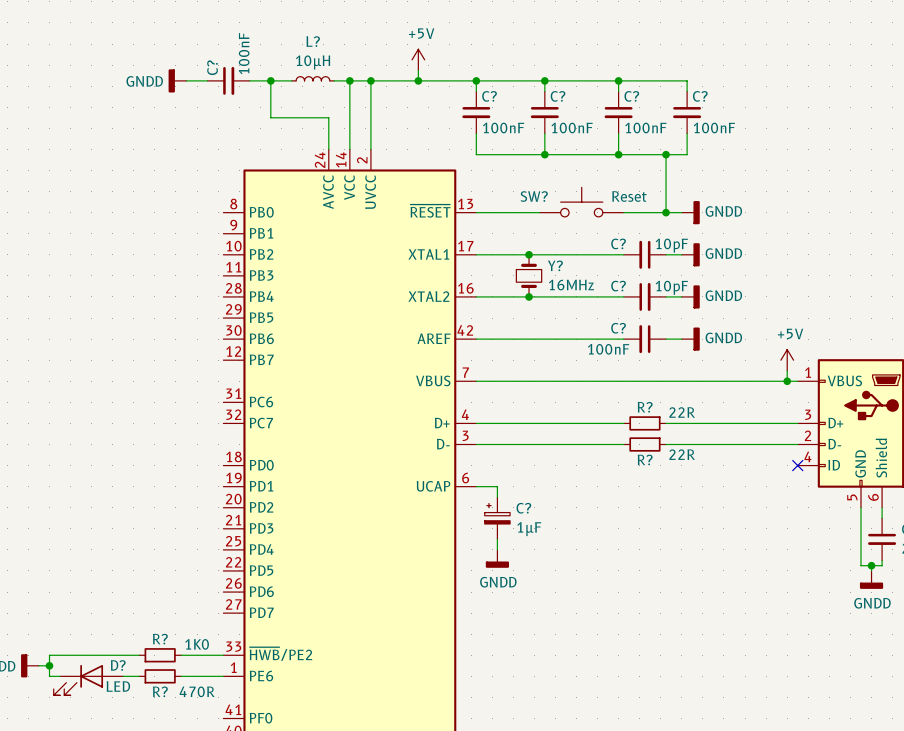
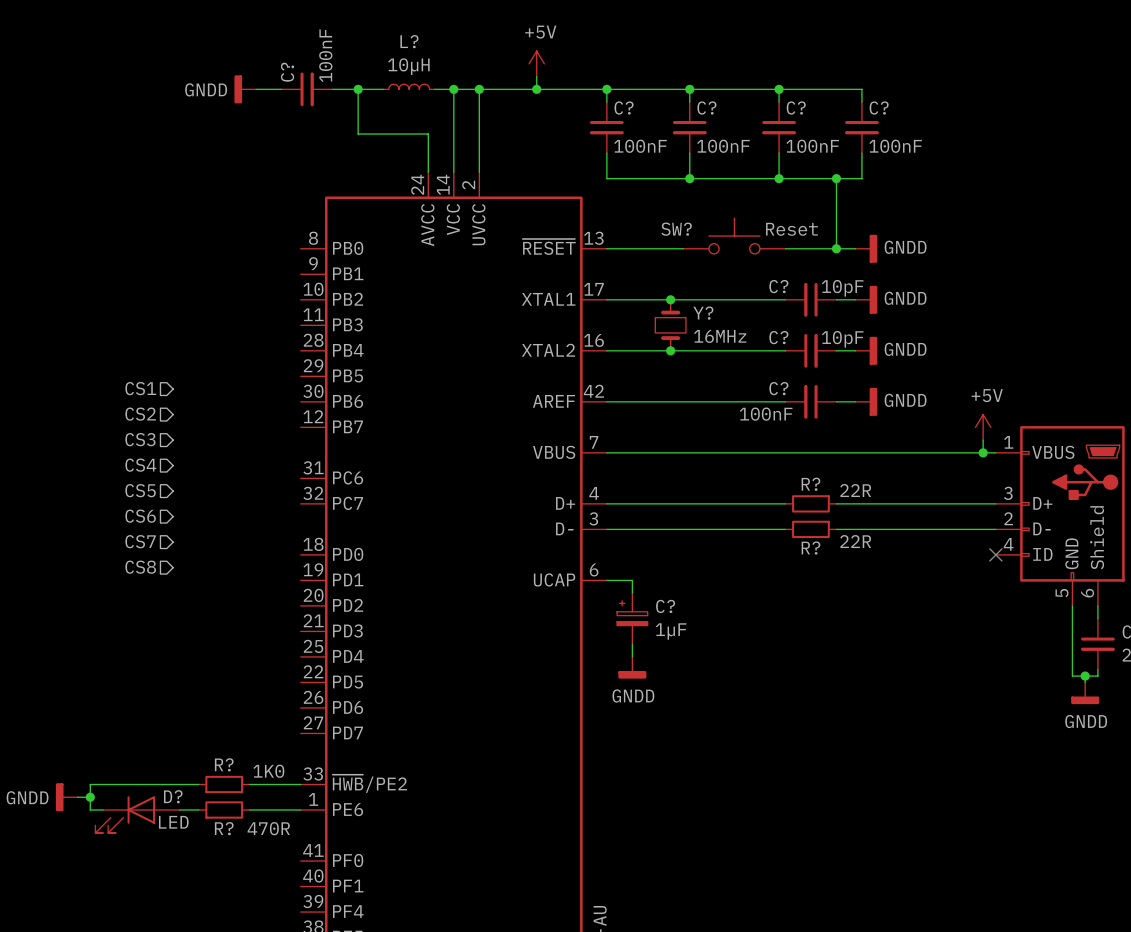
hierarchical label: none -> CS1 (140, 388)
hierarchical label: none -> CS2 (140, 414)
hierarchical label: none -> CS3 (140, 439)
hierarchical label: none -> CS4 (140, 465)
hierarchical label: none -> CS5 (140, 490)
hierarchical label: none -> CS6 (140, 516)
hierarchical label: none -> CS7 (140, 541)
hierarchical label: none -> CS8 (140, 567)

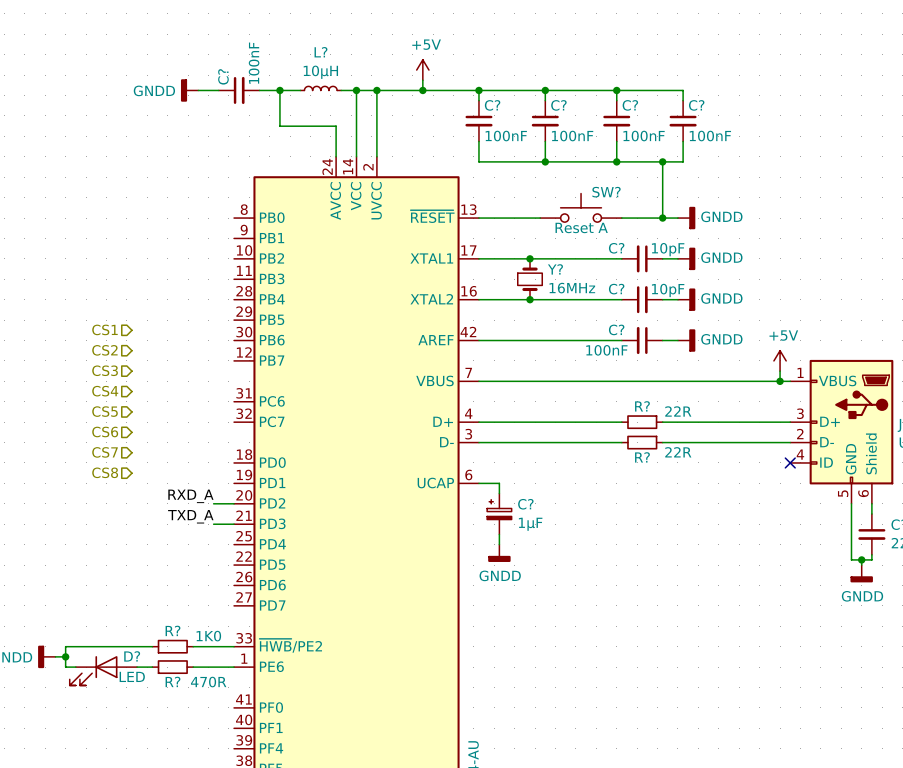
SW? name position: SW? (676, 229) -> SW? (606, 192)
SW? value: Reset (791, 229) -> Reset A (581, 227)
label: none -> RXD_A (190, 496)
wire: none -> (213, 503) (234, 503)
label: none -> TXD_A (190, 516)
wire: none -> (213, 524) (234, 524)

